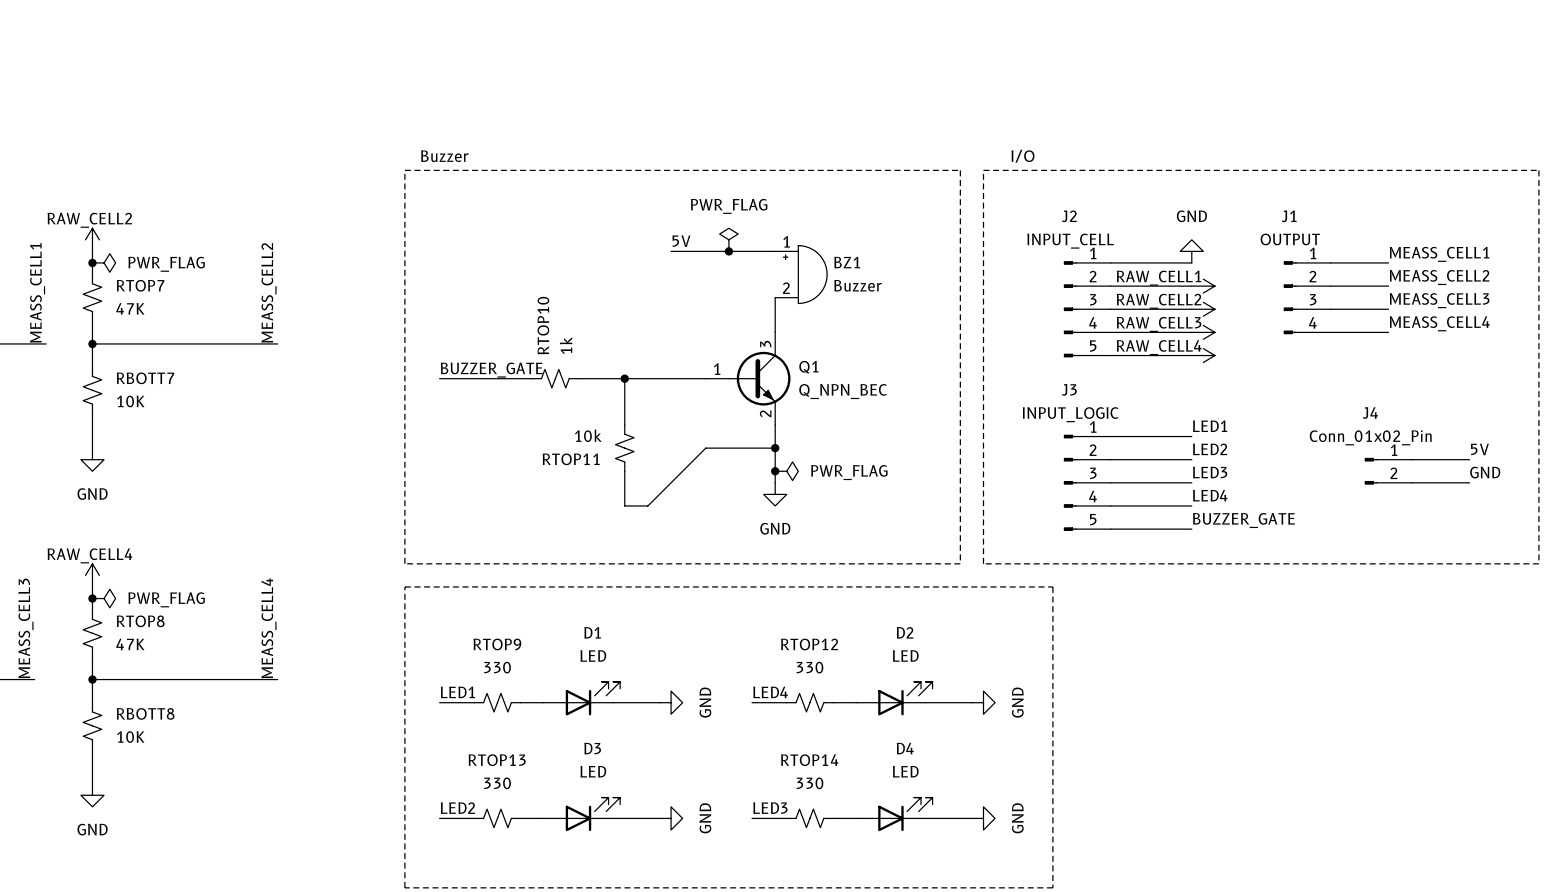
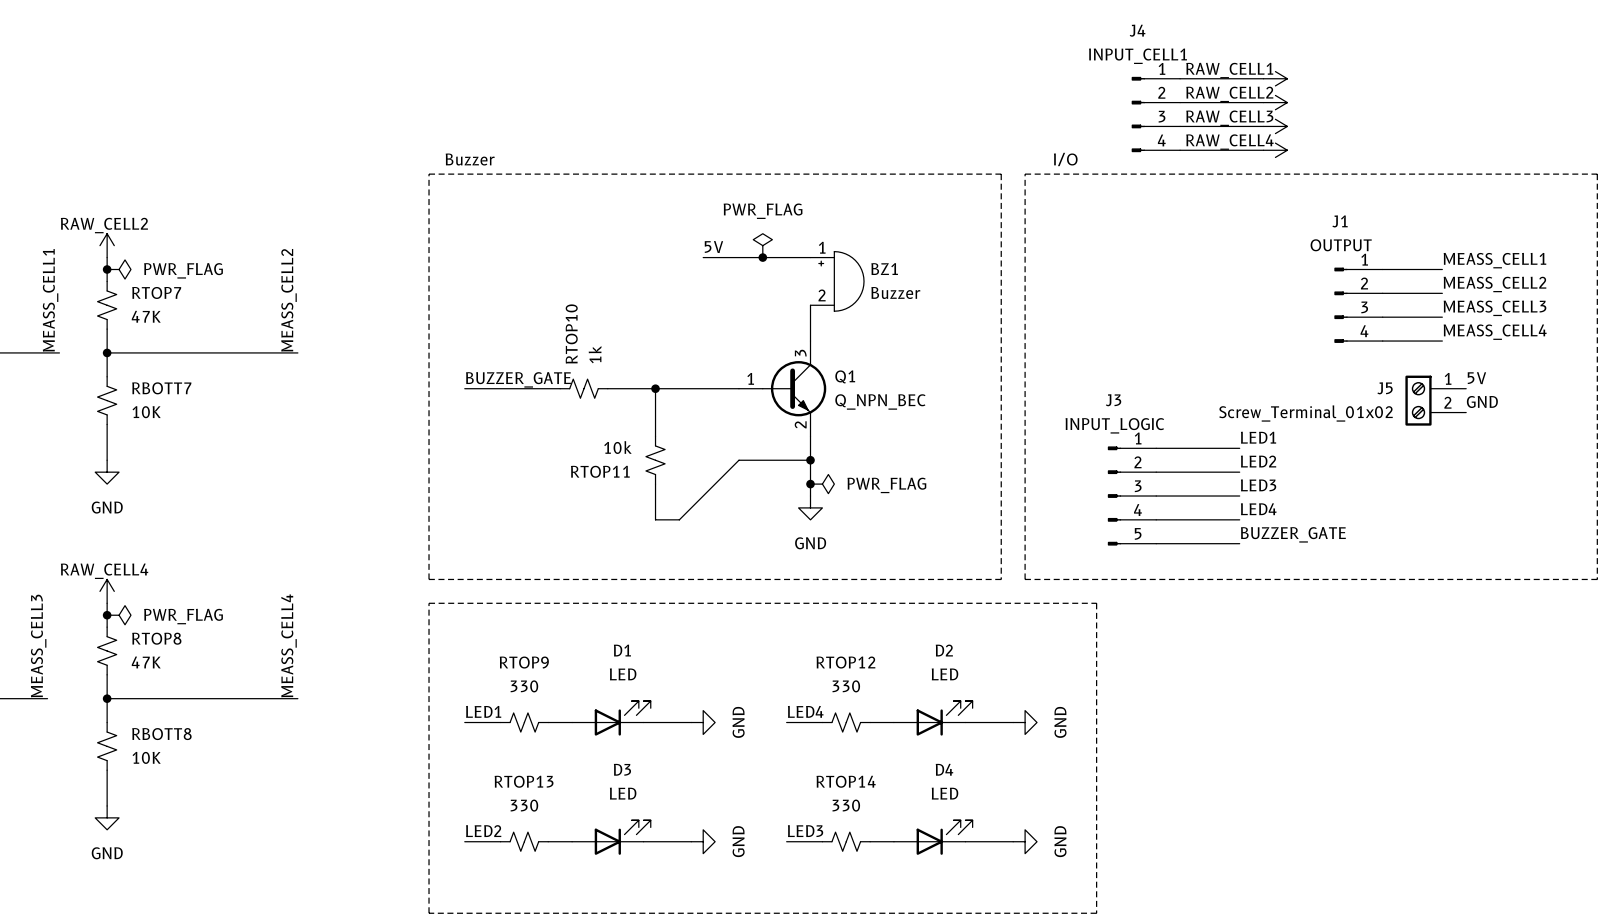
power symbol: GND (1191, 251) -> none
wire: (1110, 262) (1191, 262) -> (1180, 78) (1263, 78)
wire: (1110, 286) (1191, 286) -> (1180, 102) (1263, 102)
power symbol position: RAW_CELL1 (1203, 286) -> RAW_CELL1 (1275, 78)
J2: INPUT_CELL (1087, 309) -> none
wire: (1110, 309) (1191, 309) -> (1180, 126) (1263, 126)
power symbol position: RAW_CELL2 (1203, 309) -> RAW_CELL2 (1275, 102)
wire: (1110, 332) (1191, 332) -> (1180, 150) (1263, 150)
power symbol position: RAW_CELL3 (1203, 332) -> RAW_CELL3 (1275, 126)
wire: (1110, 355) (1191, 355) -> none
power symbol position: RAW_CELL4 (1203, 355) -> RAW_CELL4 (1275, 150)
J5: none -> Screw_Terminal_01x02 (1435, 400)
J4 name position: J4 (1370, 413) -> J4 (1137, 30)
J4 value: Conn_01x02_Pin (1370, 437) -> INPUT_CELL1 (1137, 56)
label position: 5V (1479, 449) -> 5V (1476, 378)
J4 symbol: [1364, 457, 1412, 485] -> [1131, 76, 1181, 153]
wire: (1411, 459) (1469, 459) -> none
label position: GND (1485, 472) -> GND (1482, 401)
wire: (1411, 482) (1469, 482) -> none

